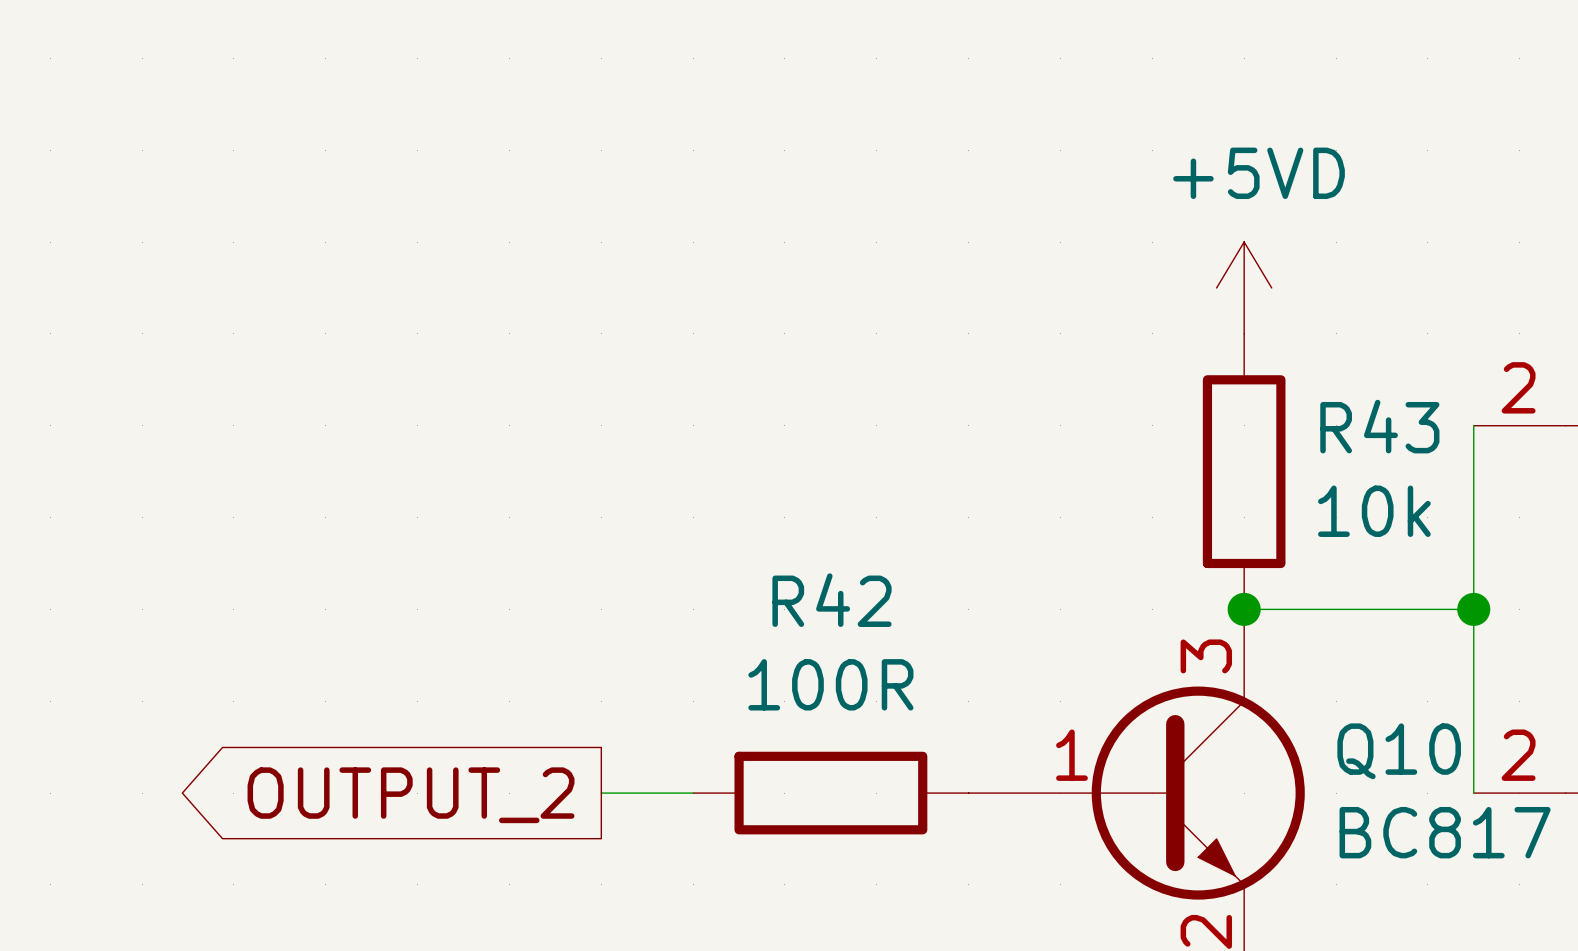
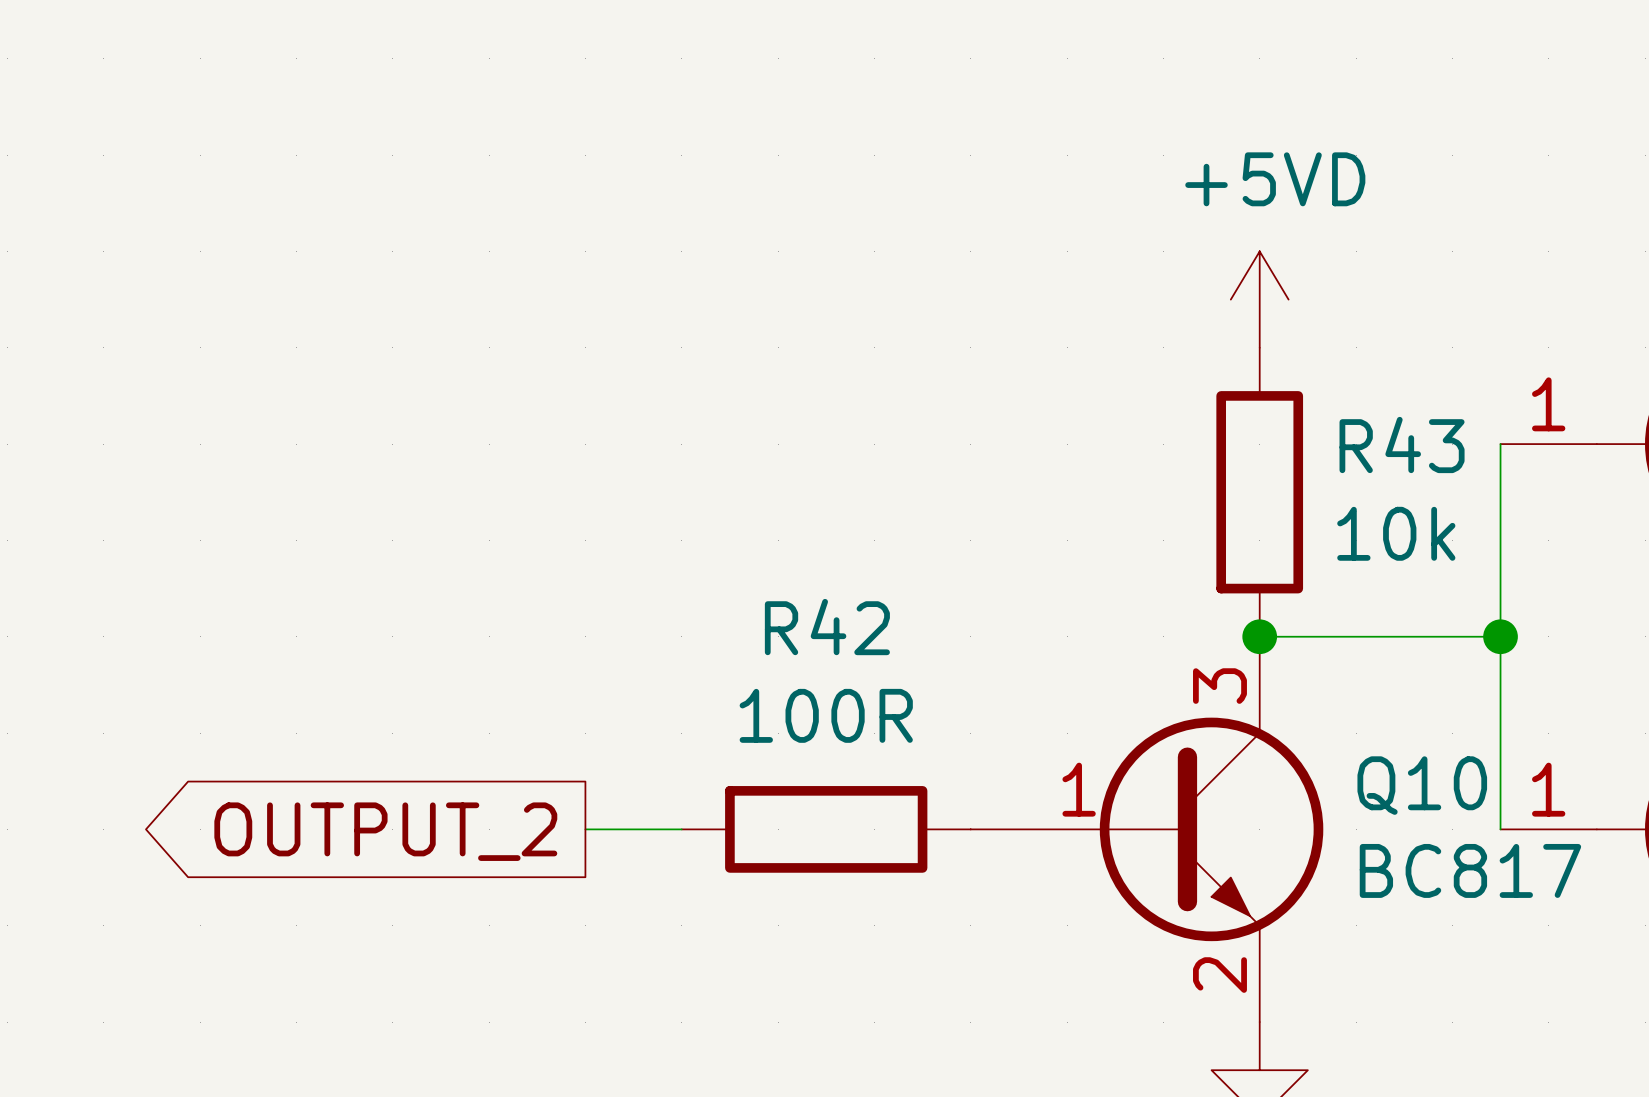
part pin number: 2 (1518, 387) -> 1 (1548, 404)
part pin number: 2 (1518, 755) -> 1 (1548, 789)

